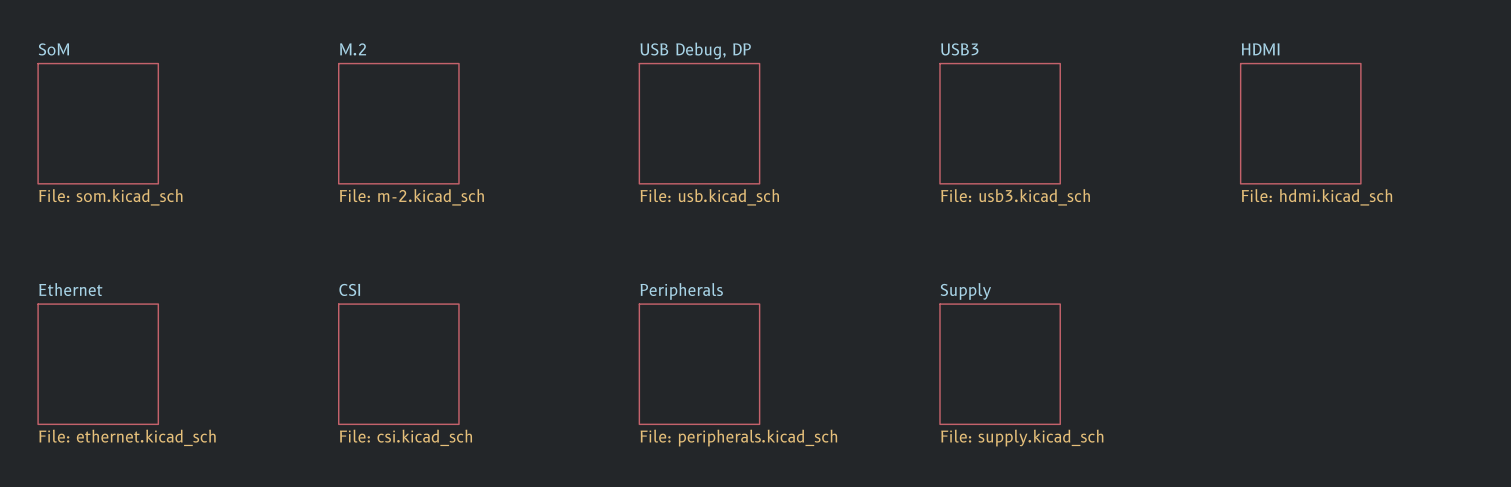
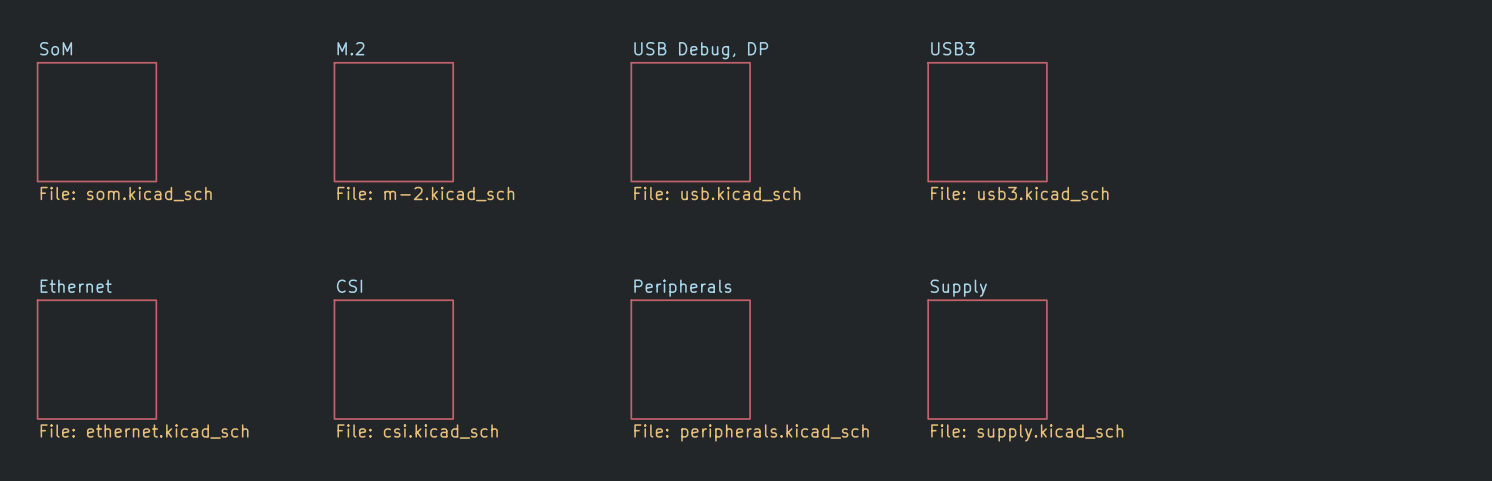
sheet HDMI: File: hdmi.kicad_sch (1300, 123) -> none

